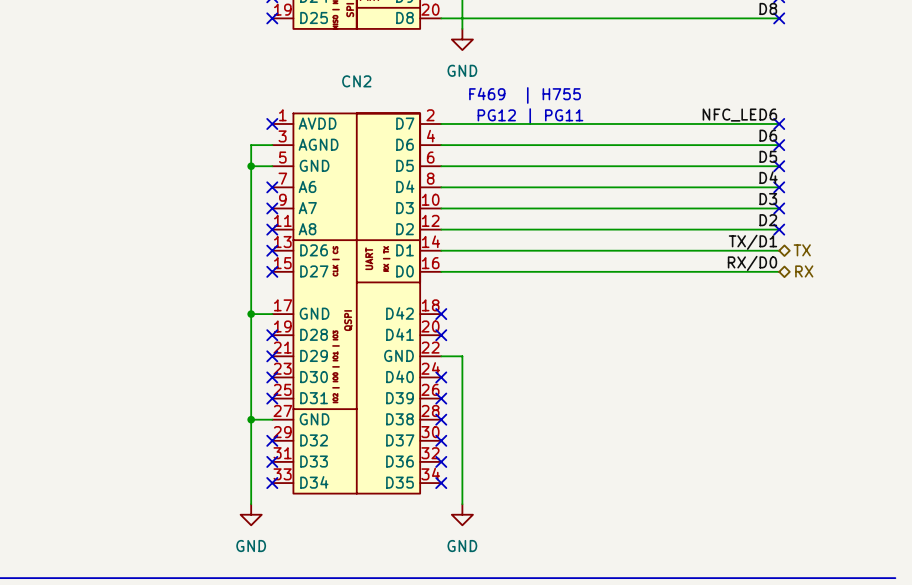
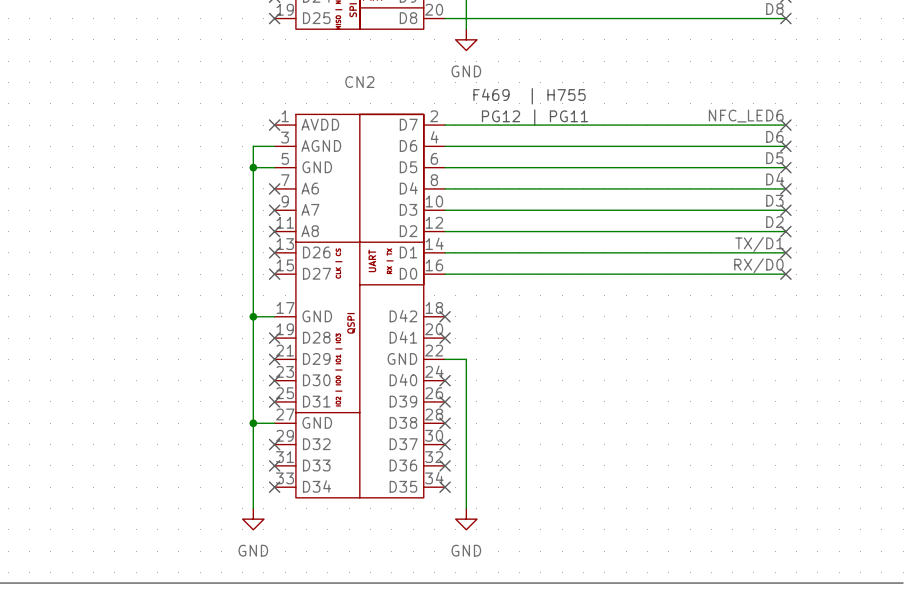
no-connect mark: none -> (785, 252)
hierarchical label: TX (802, 250) -> none
no-connect mark: none -> (785, 274)
hierarchical label: RX (804, 271) -> none

